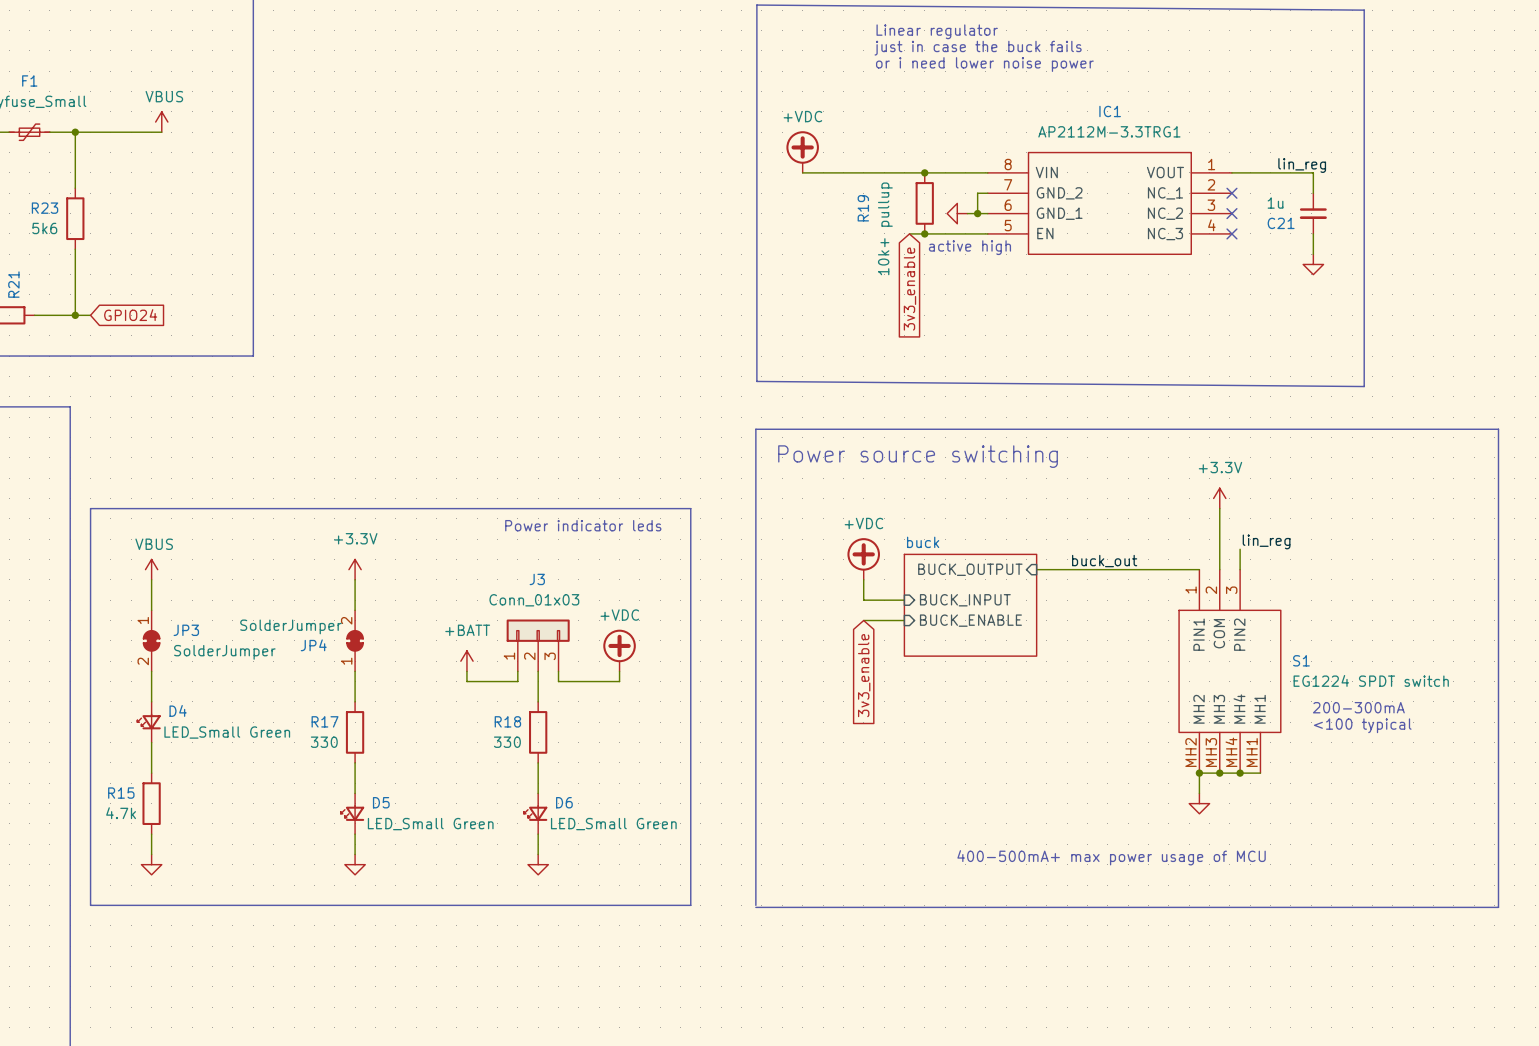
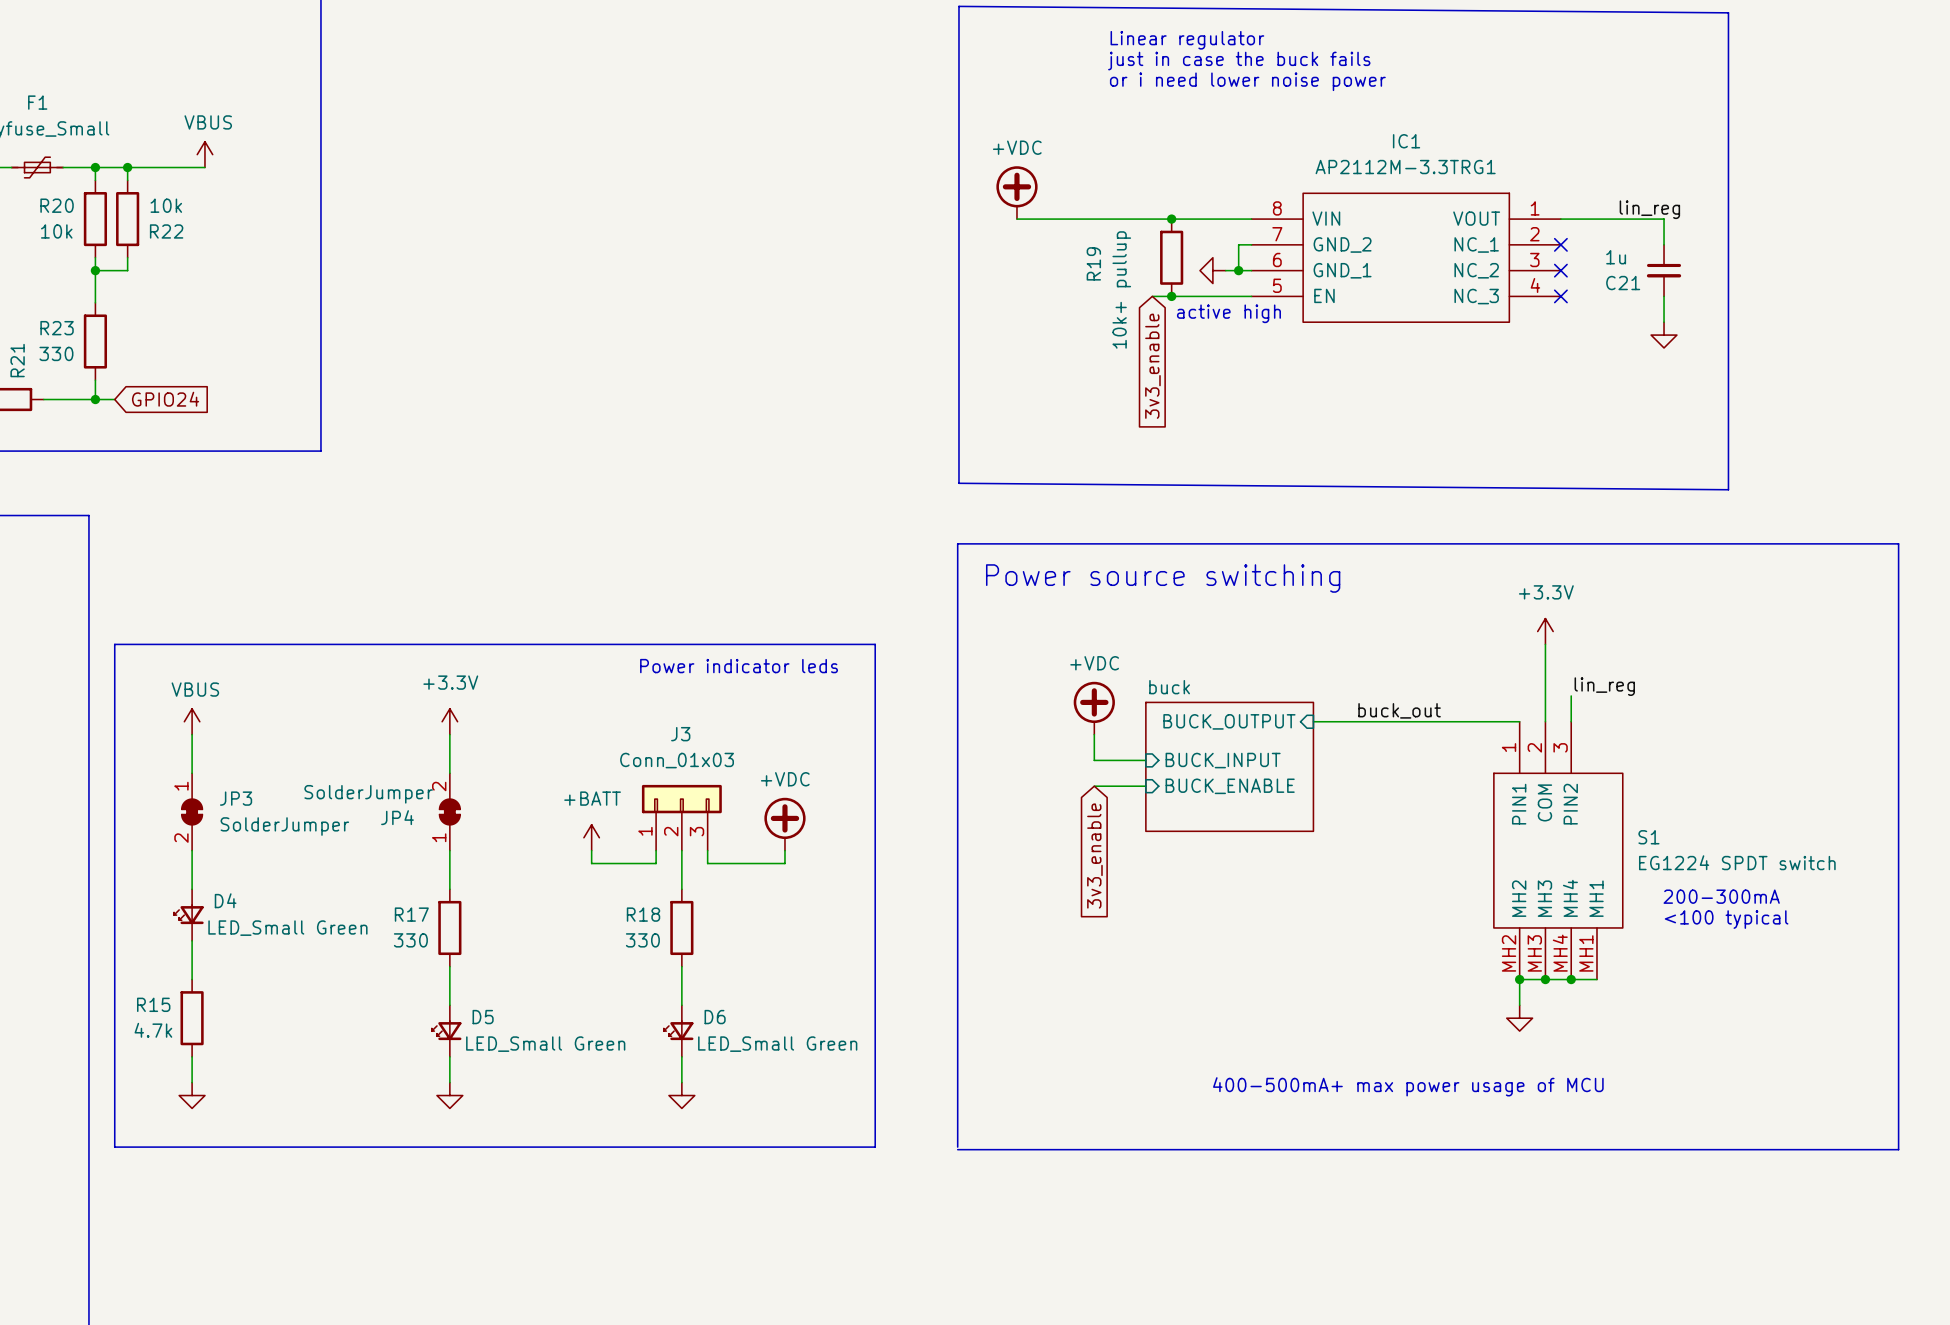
wire: none -> (127, 167) (127, 180)
junction: none -> (127, 167)
wire: (75, 142) (75, 188) -> none
R20: none -> 10k (95, 219)
R22: none -> 10k (127, 219)
wire: none -> (95, 257) (95, 302)
wire: none -> (127, 257) (127, 270) (95, 270)
junction: none -> (95, 270)
R23 position: (75, 218) -> (95, 341)
R23 value: 5k6 (44, 228) -> 330 (56, 353)
wire: (75, 249) (75, 300) -> none

